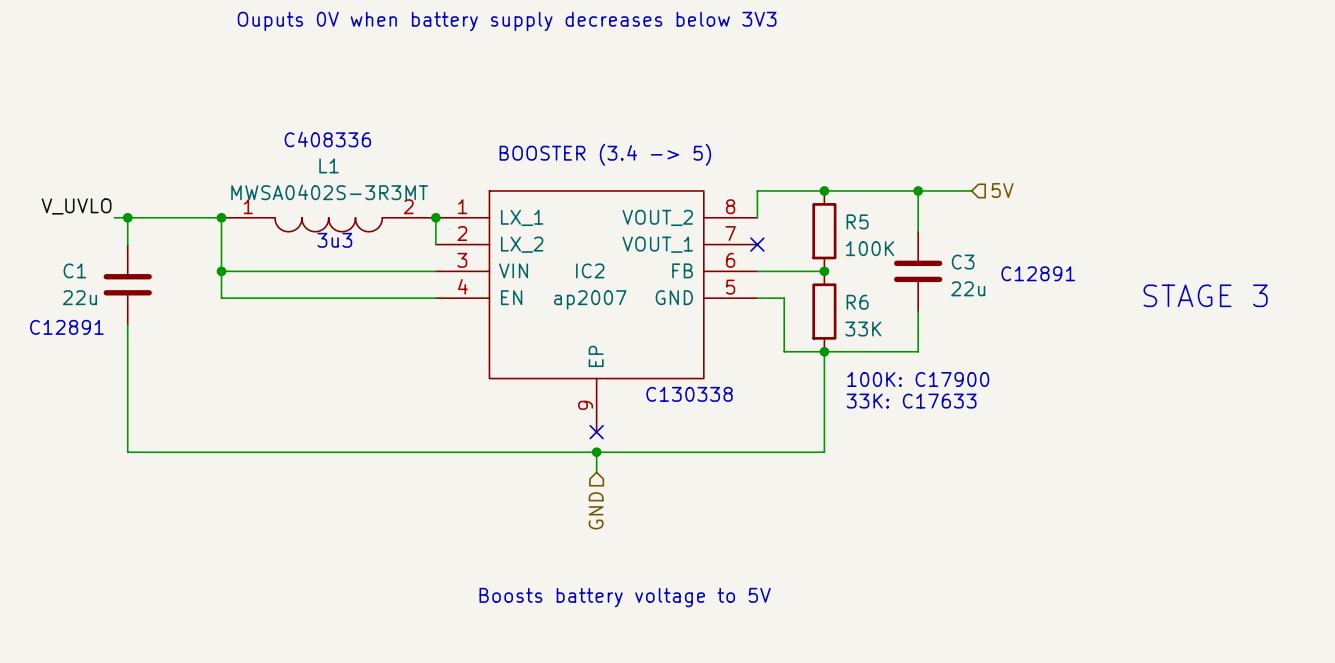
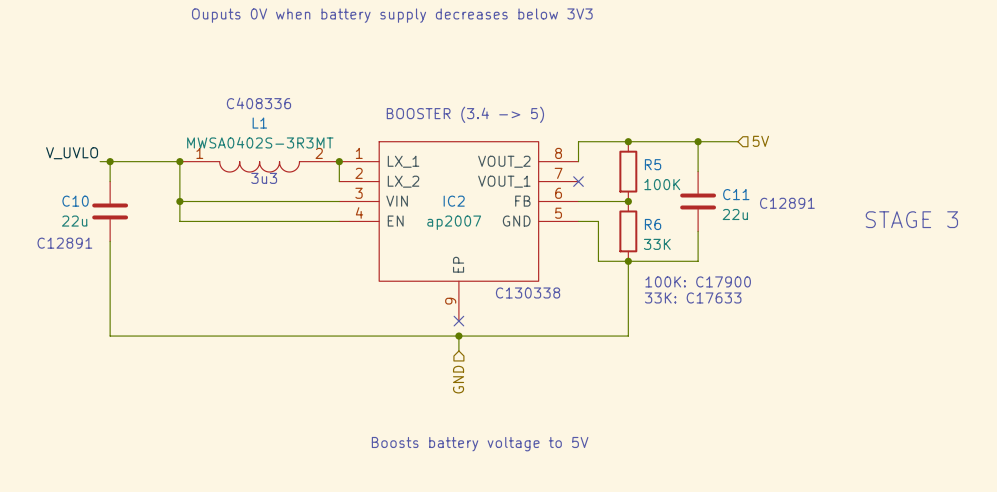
C3 name: C3 (963, 262) -> C11 (736, 194)
C1 name: C1 (74, 270) -> C10 (75, 201)

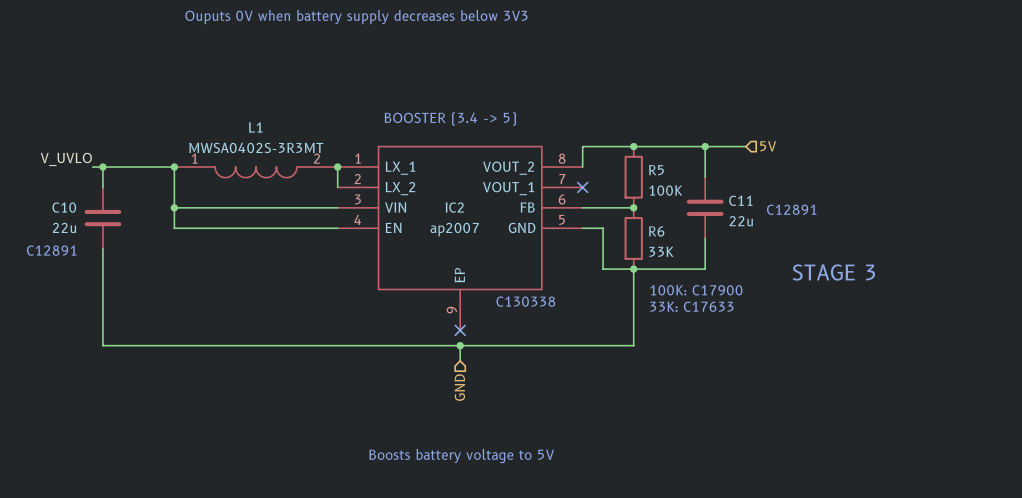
text: C408336 (258, 103) -> none
text: 3u3 (264, 178) -> none
text position: STAGE 3 (911, 219) -> STAGE 3 (833, 272)

